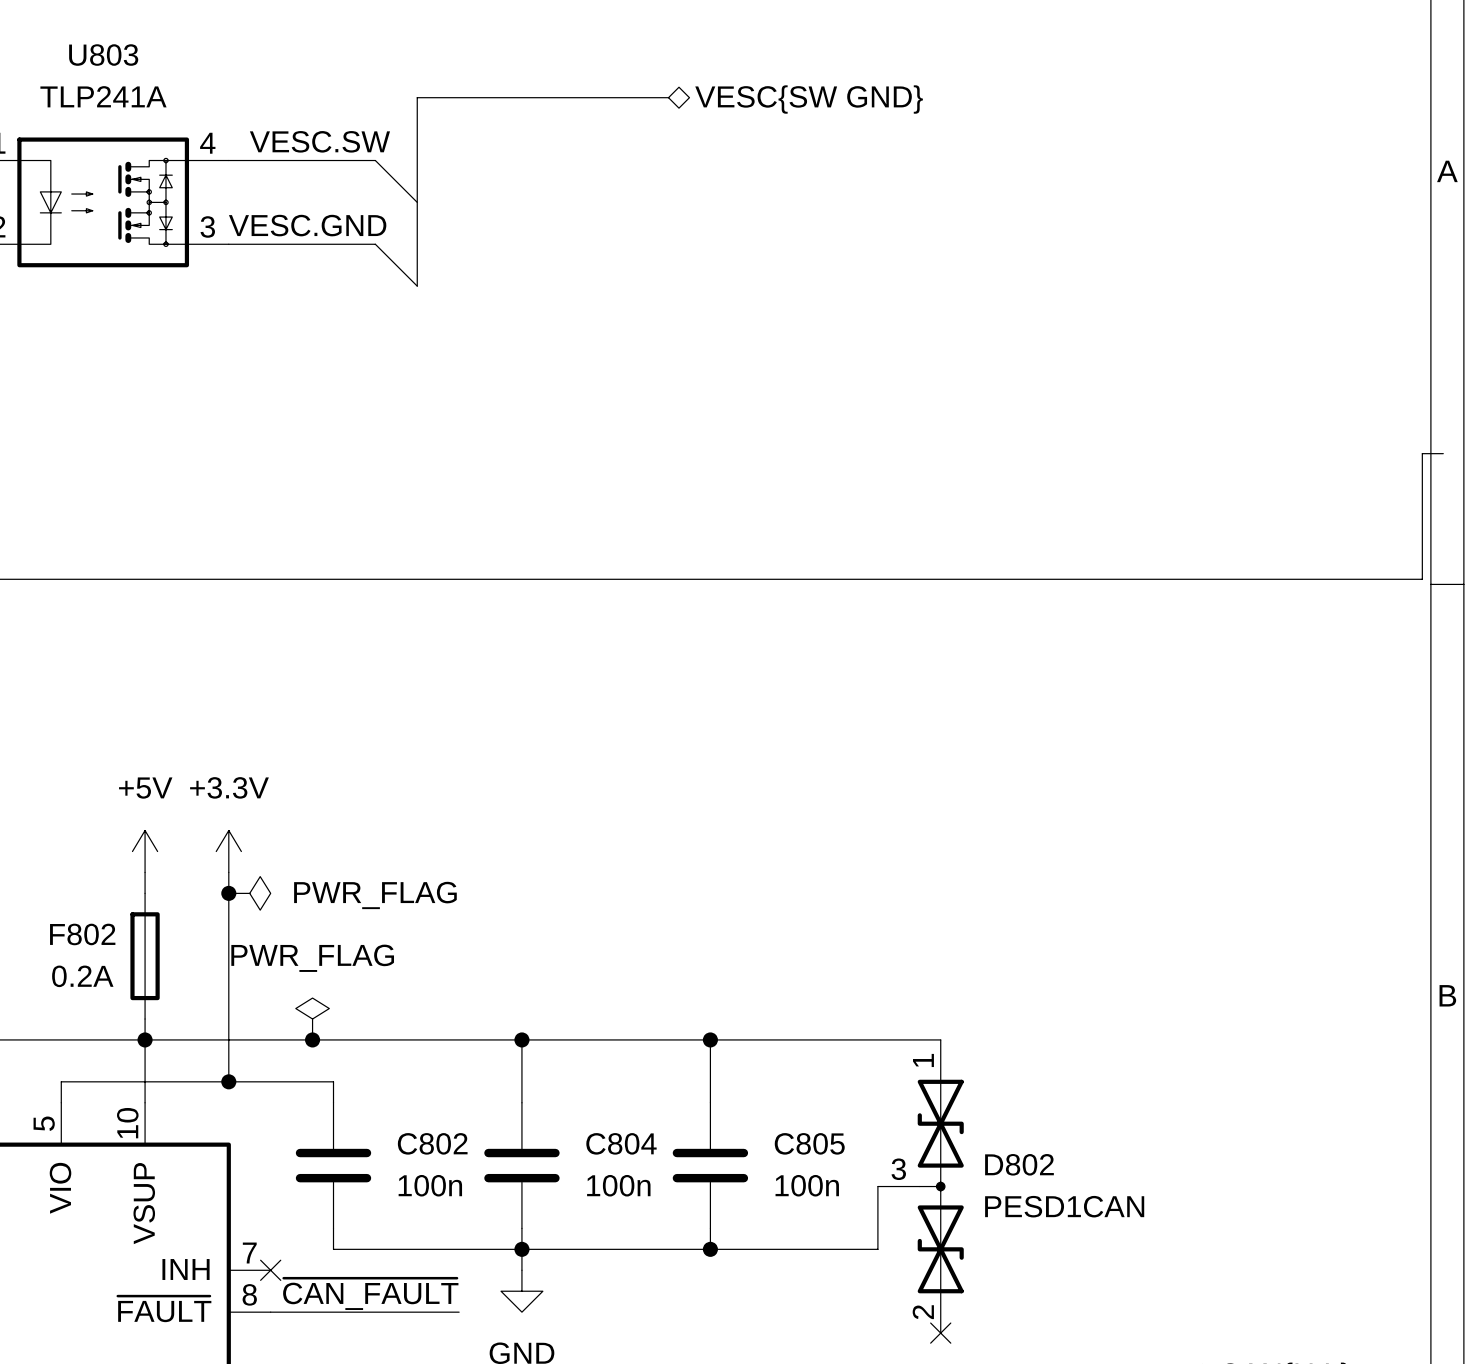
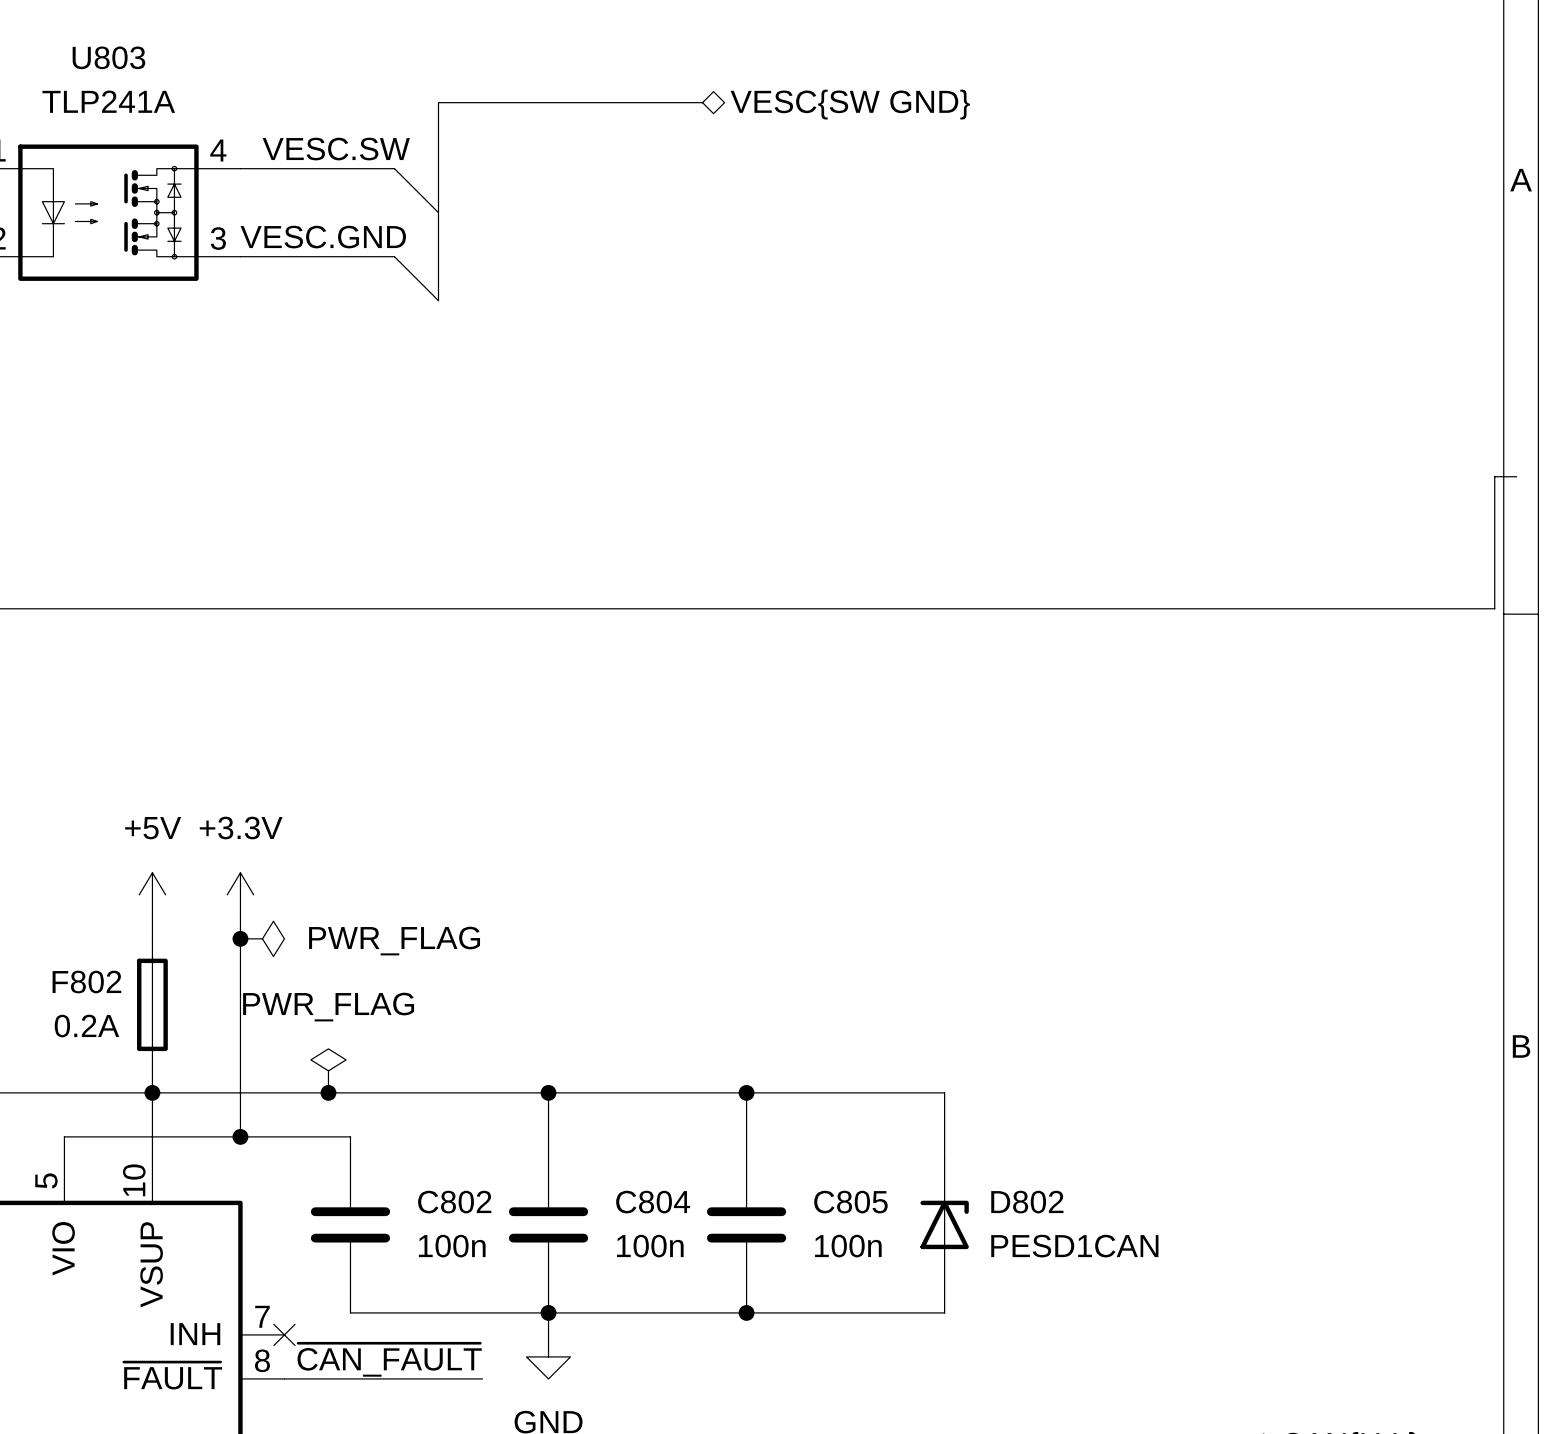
D802 symbol: [877, 1039, 964, 1334] -> [920, 1158, 969, 1291]
wire: (898, 1039) (940, 1039) -> (944, 1092) (944, 1158)
wire: (877, 1186) (877, 1249) -> (944, 1290) (944, 1312) (922, 1312)
no-connect mark: (940, 1333) -> none

